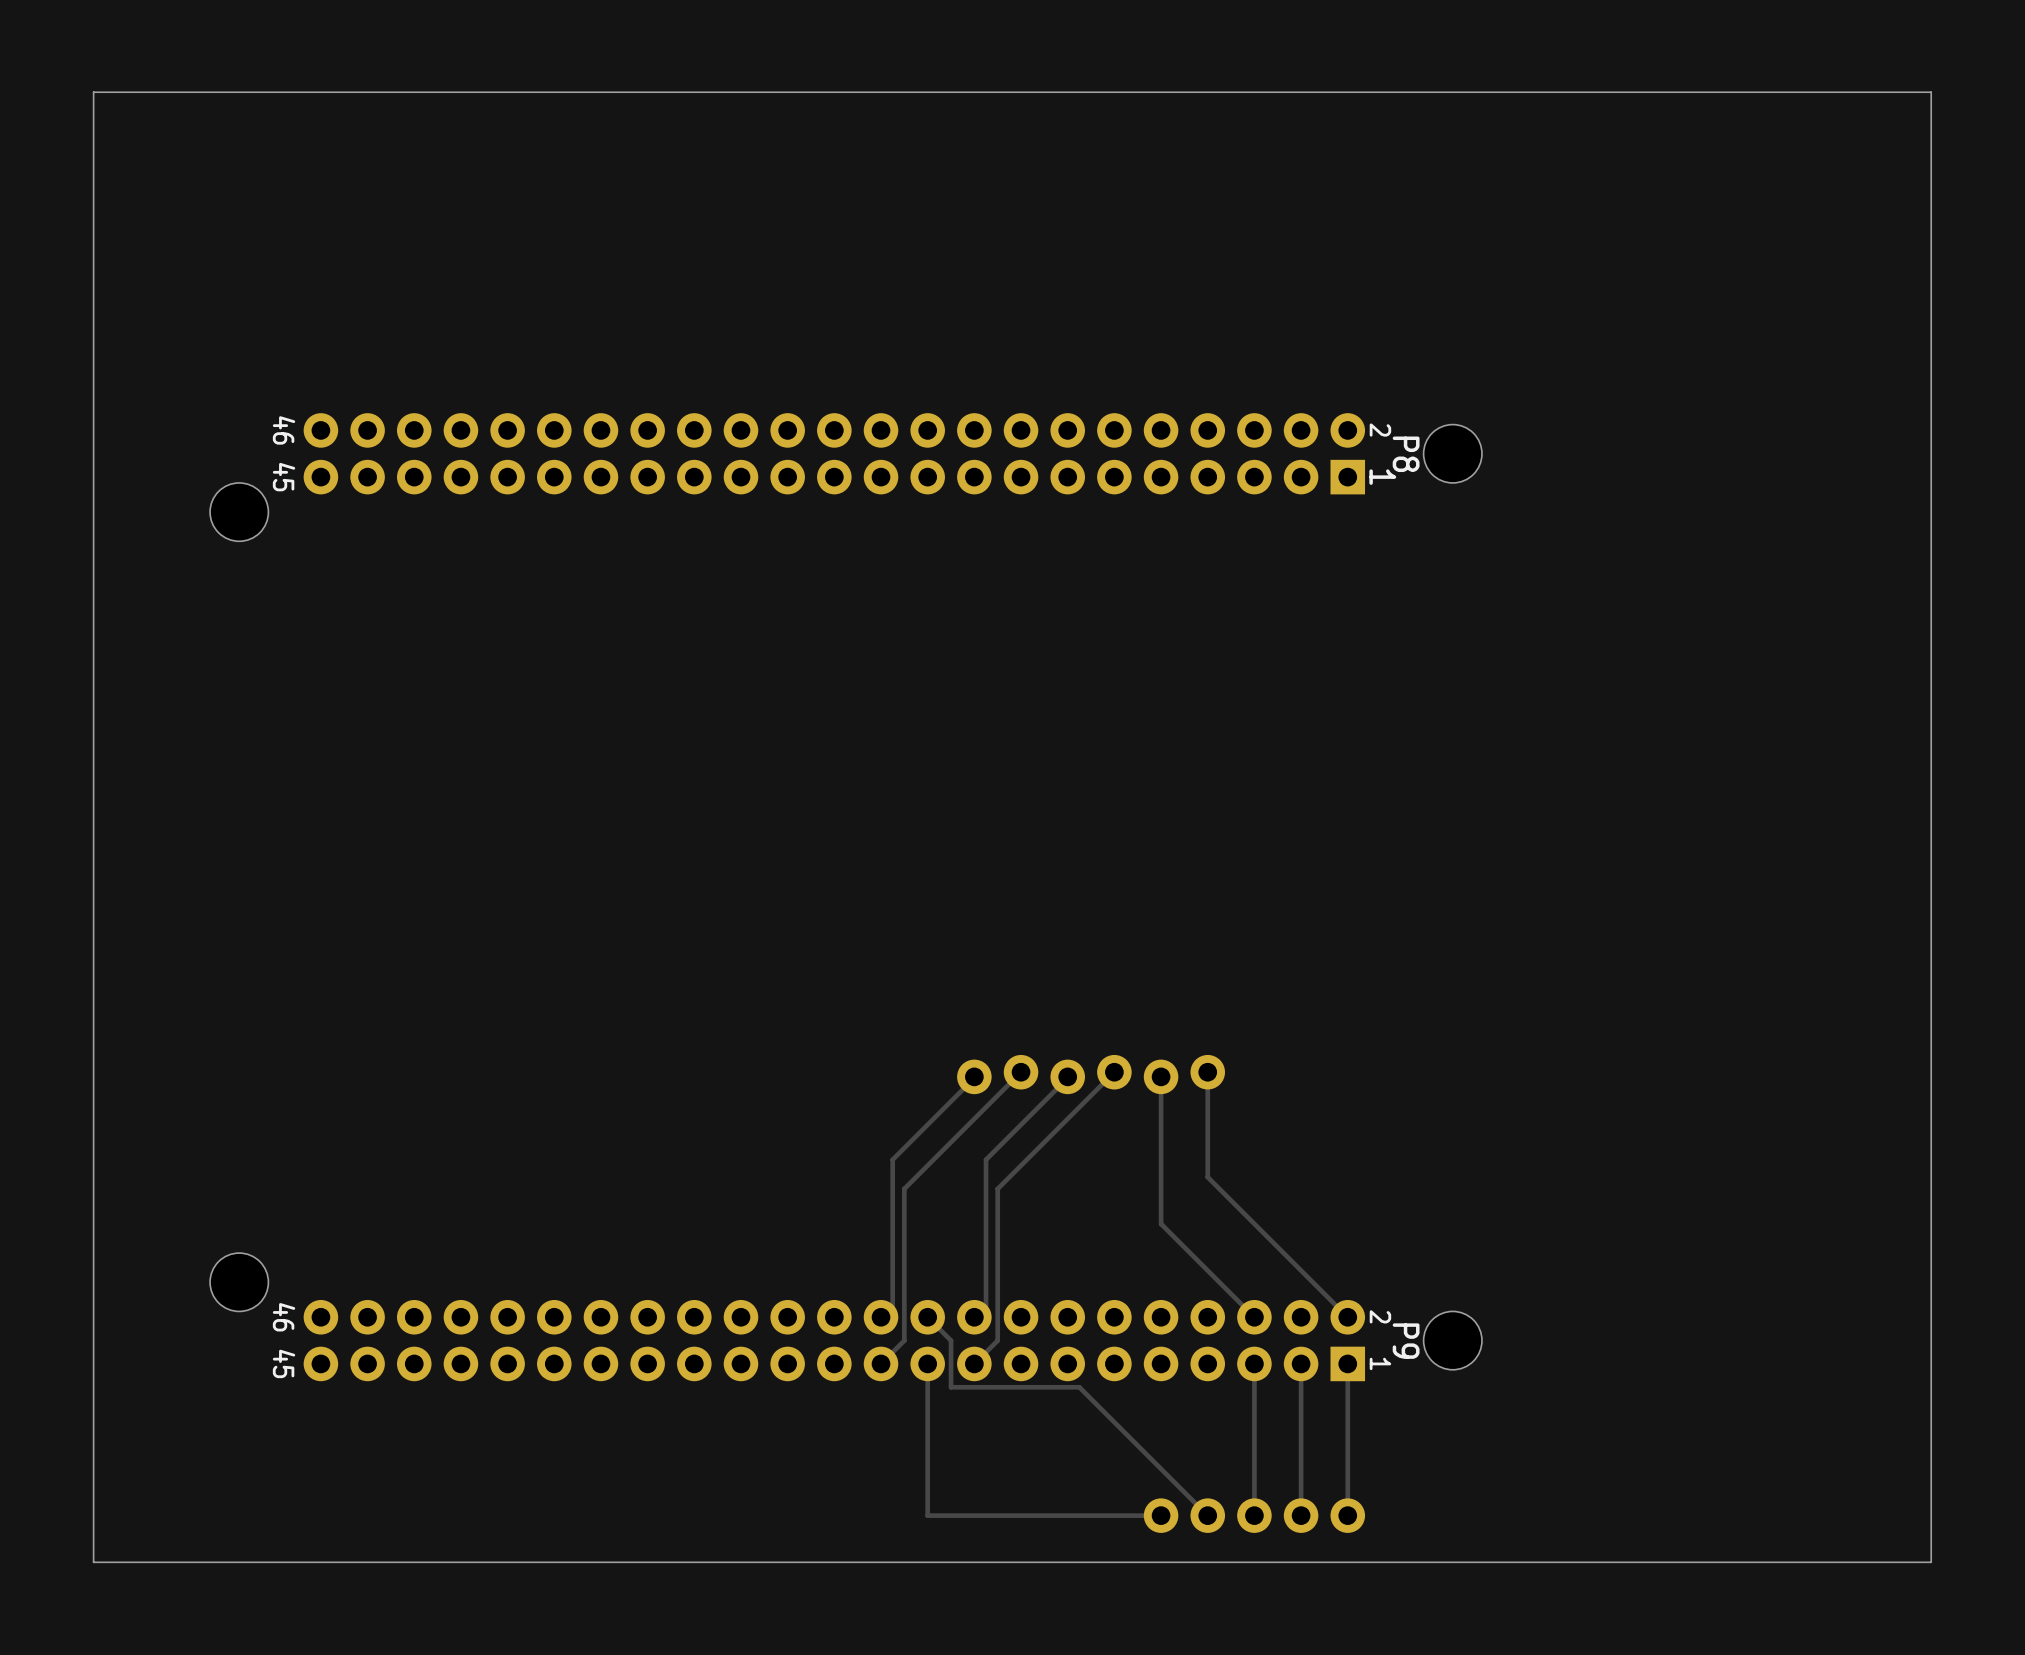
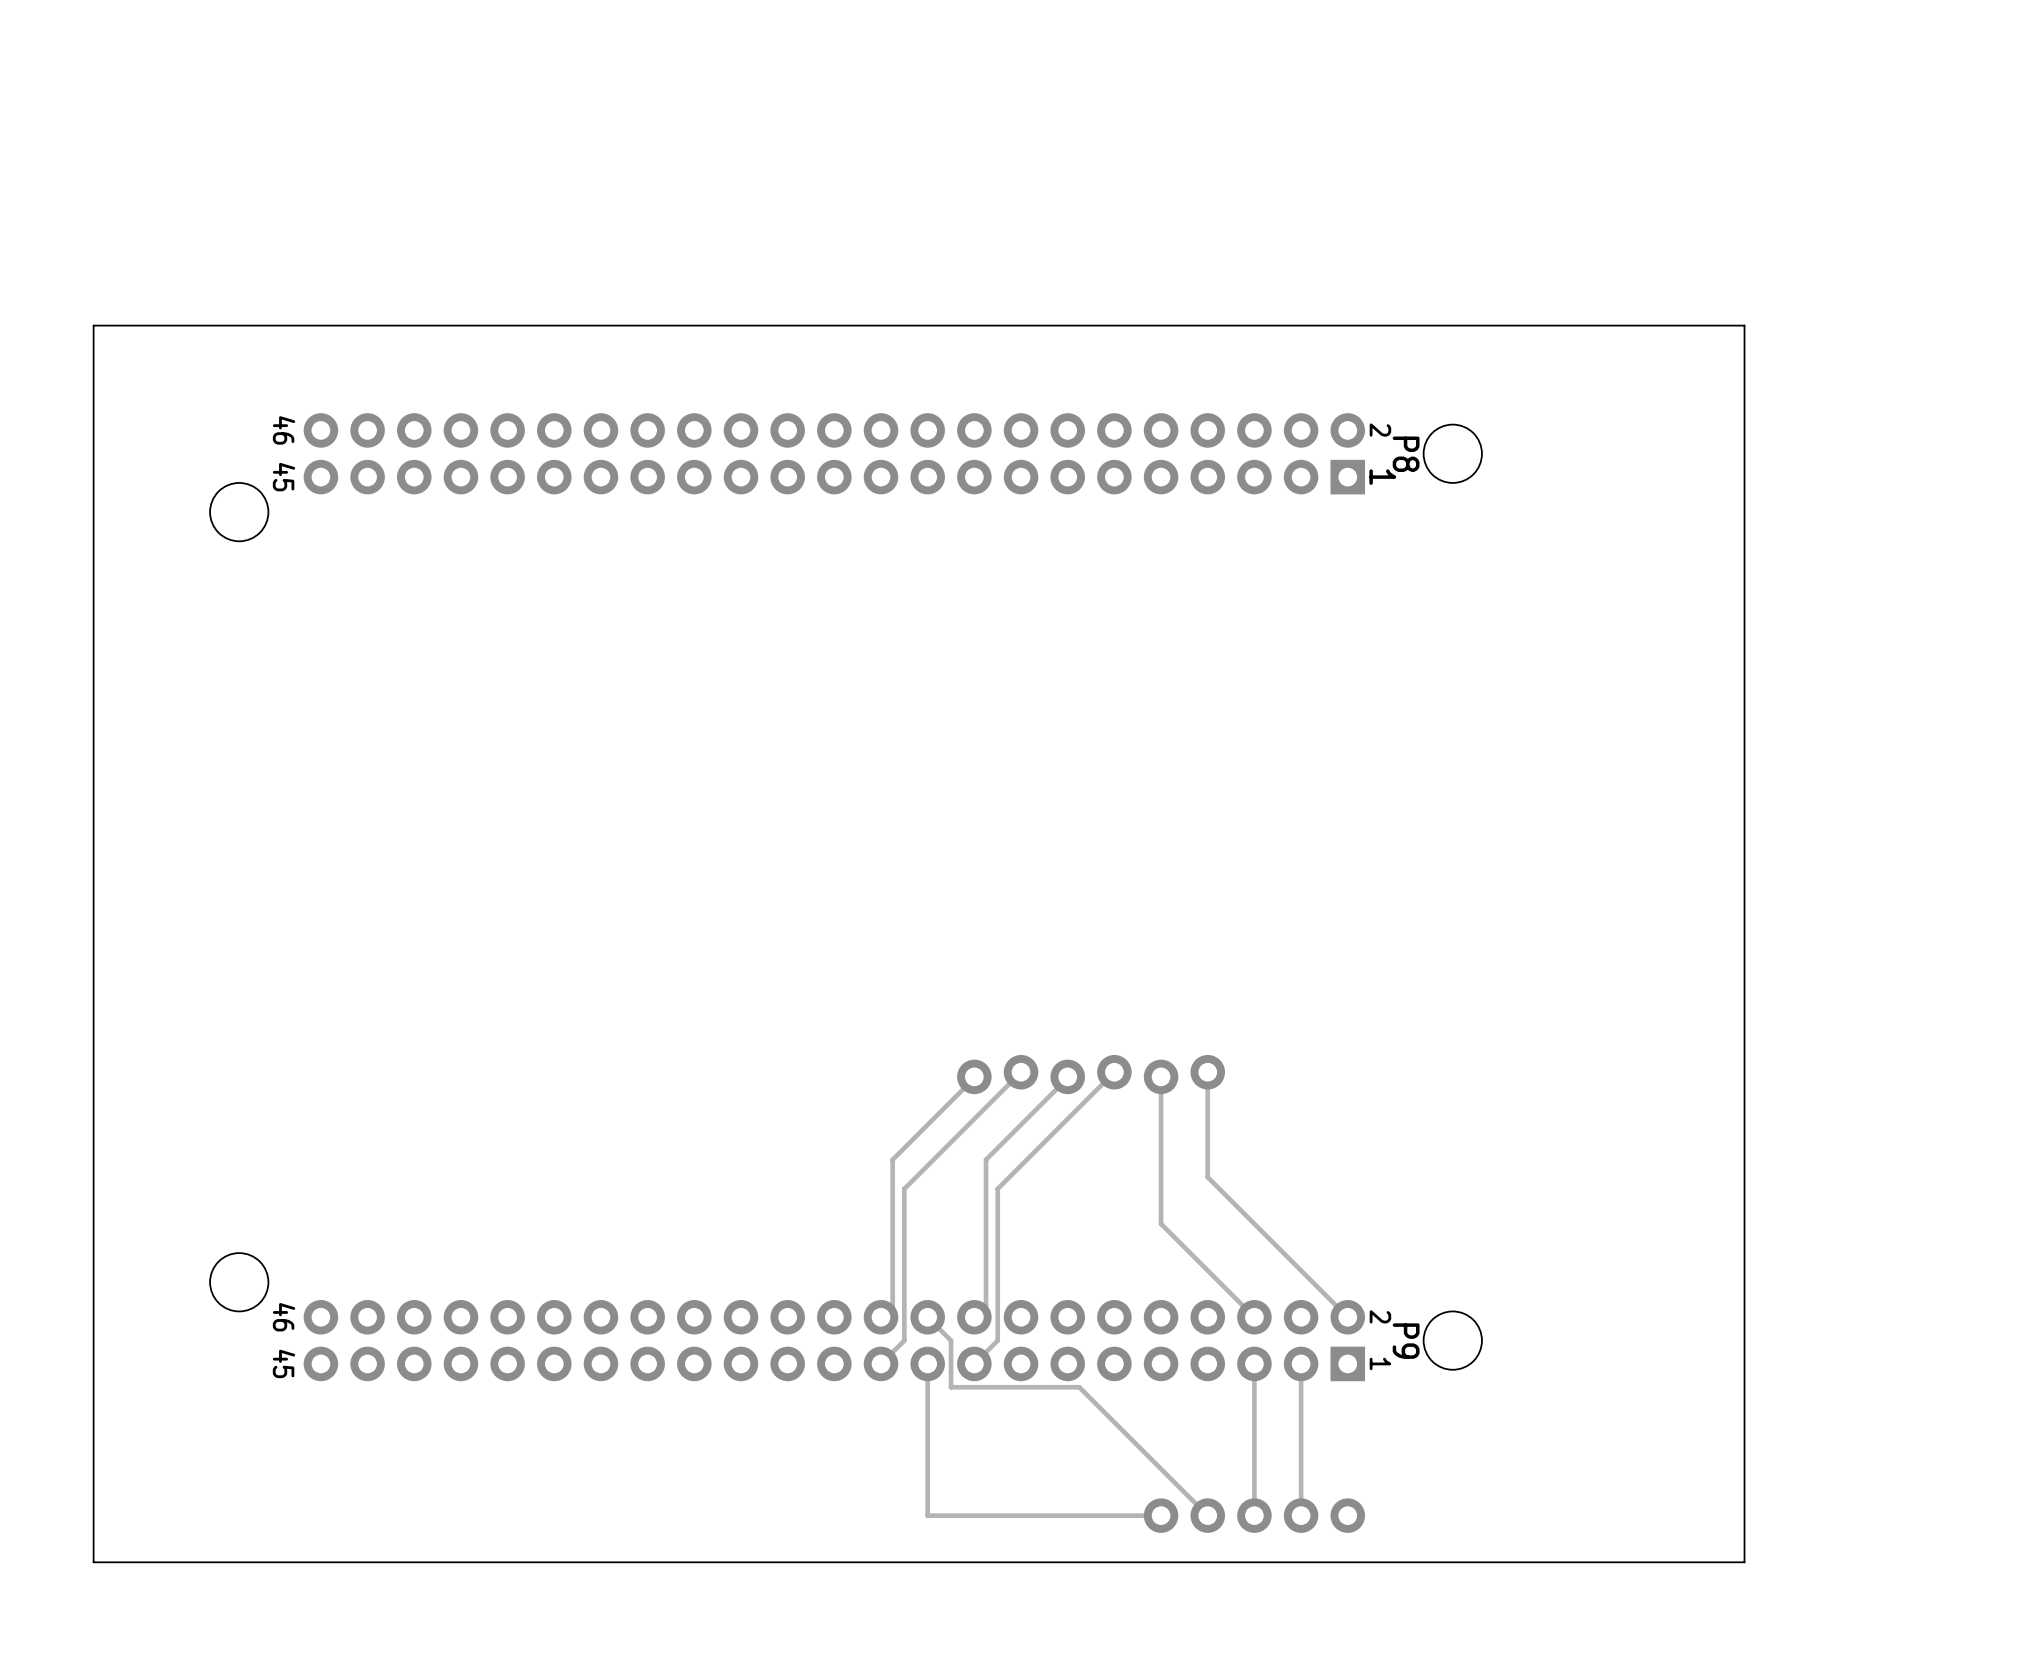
board edge: (93, 325) (93, 92) (1931, 92) (1931, 1562) (1744, 1562) -> (93, 325) (1744, 325) (1744, 1562)
track: (1347, 1363) (1347, 1515) -> none

